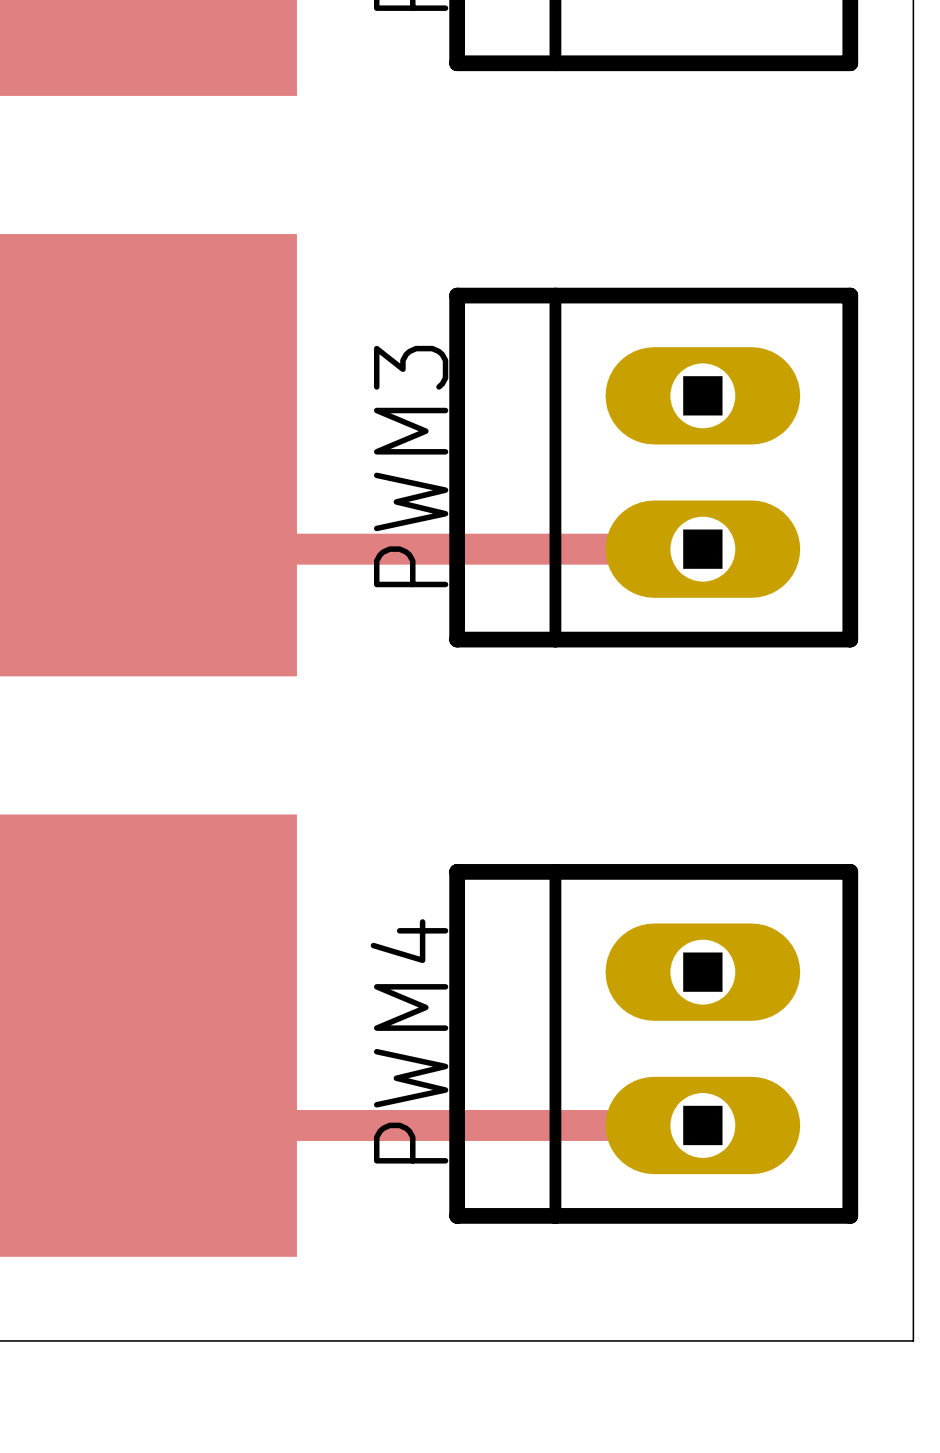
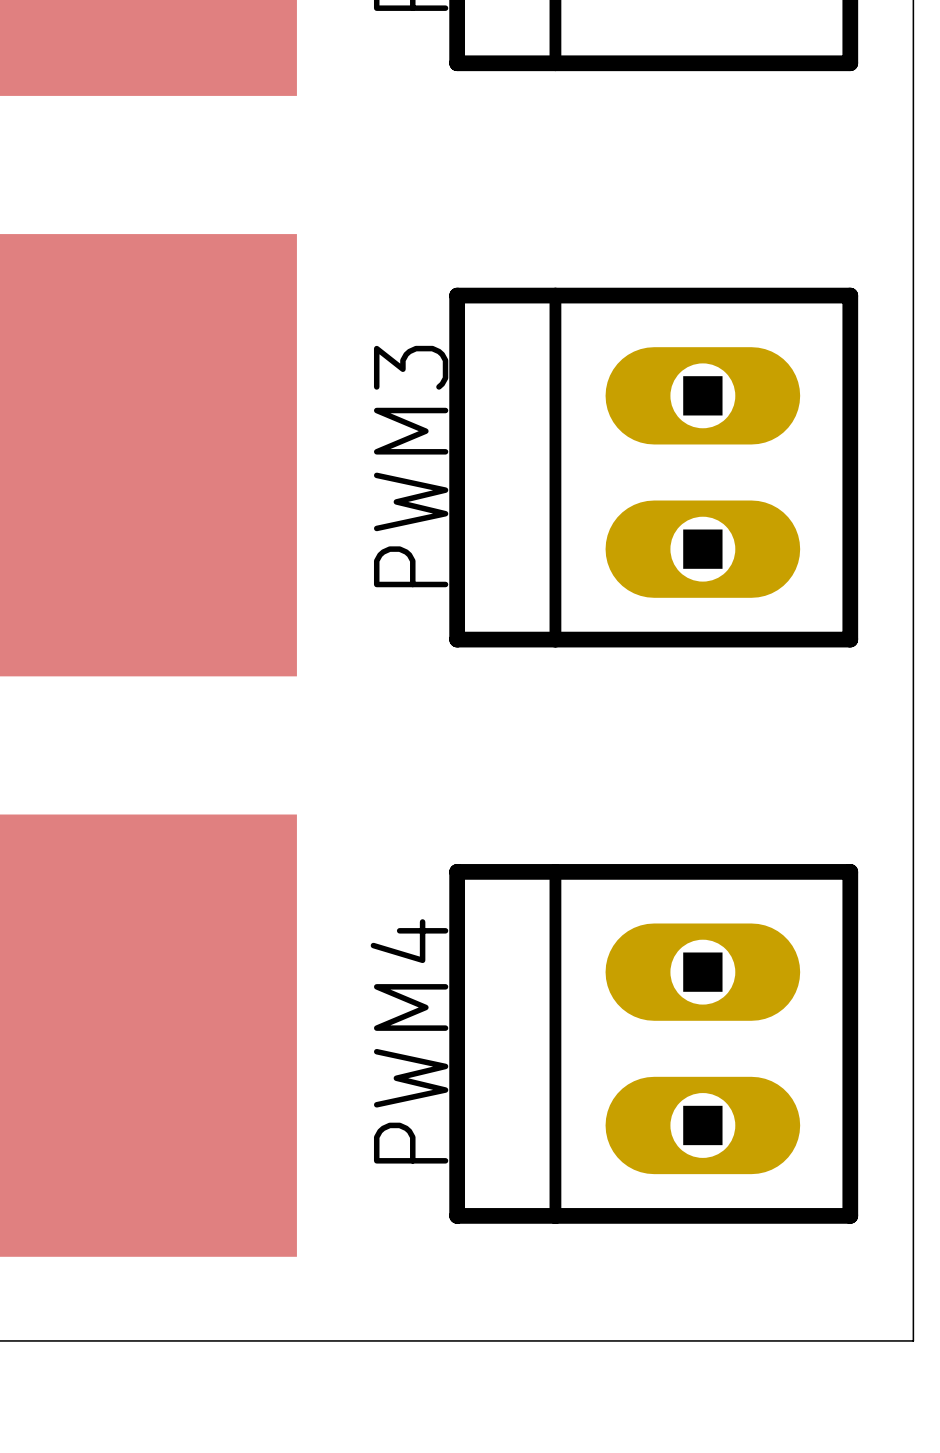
track: (124, 455) (218, 549) (702, 549) -> none
track: (124, 1035) (214, 1125) (702, 1125) -> none

